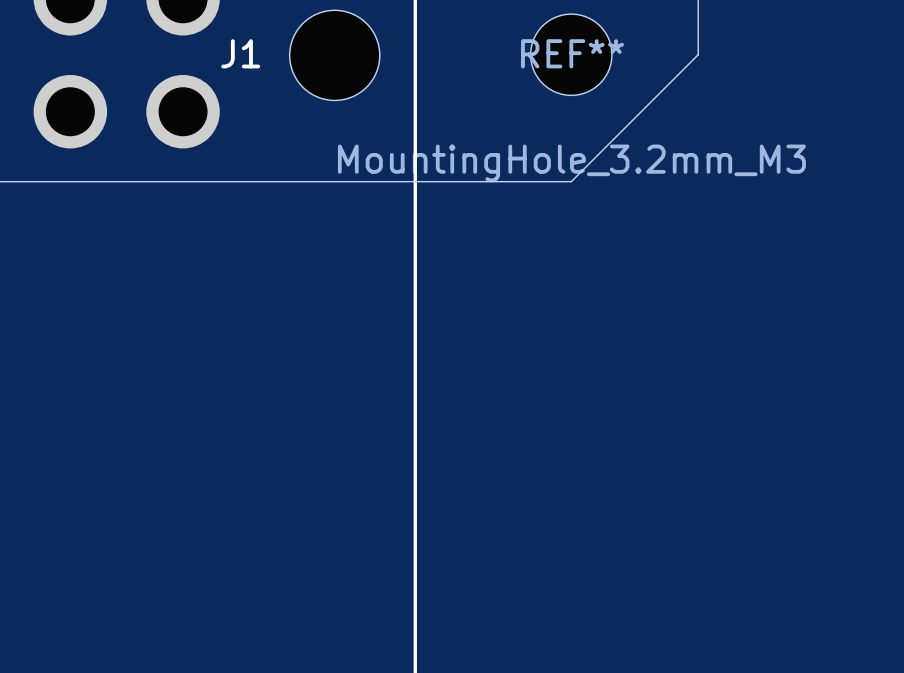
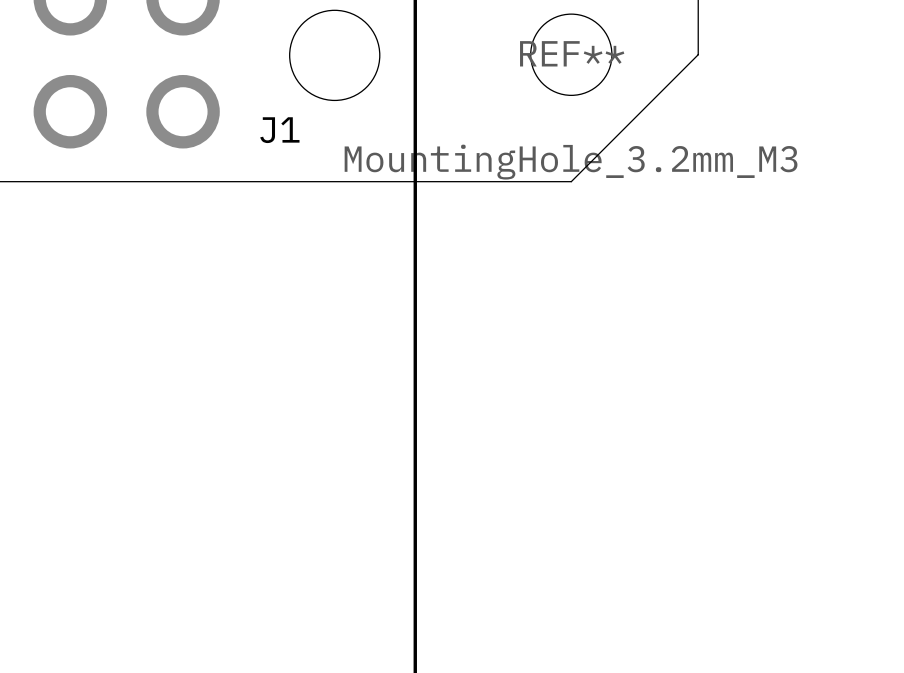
J1 name position: J1 (240, 53) -> J1 (279, 130)

